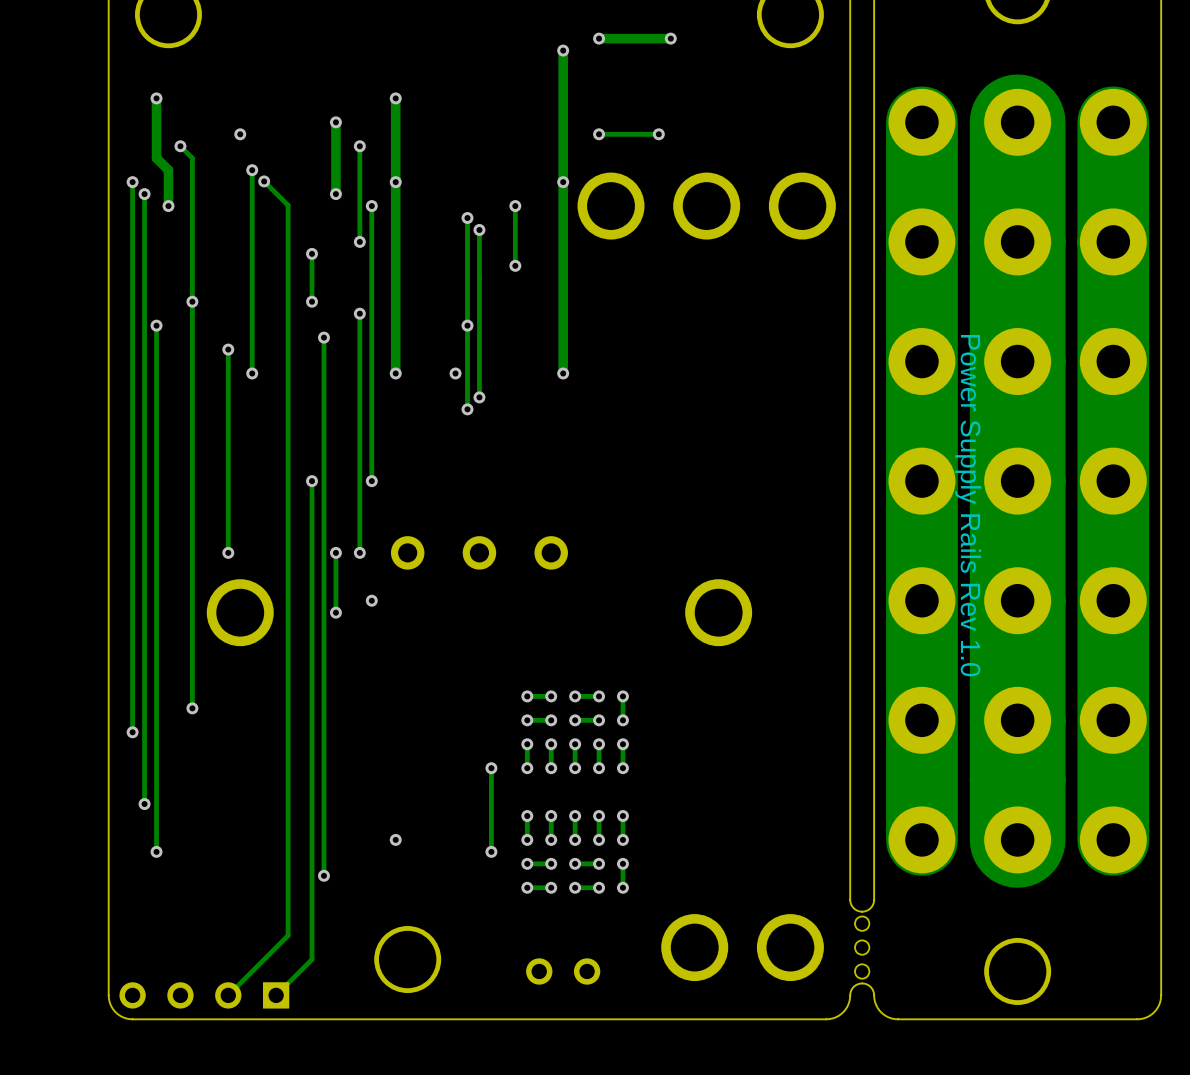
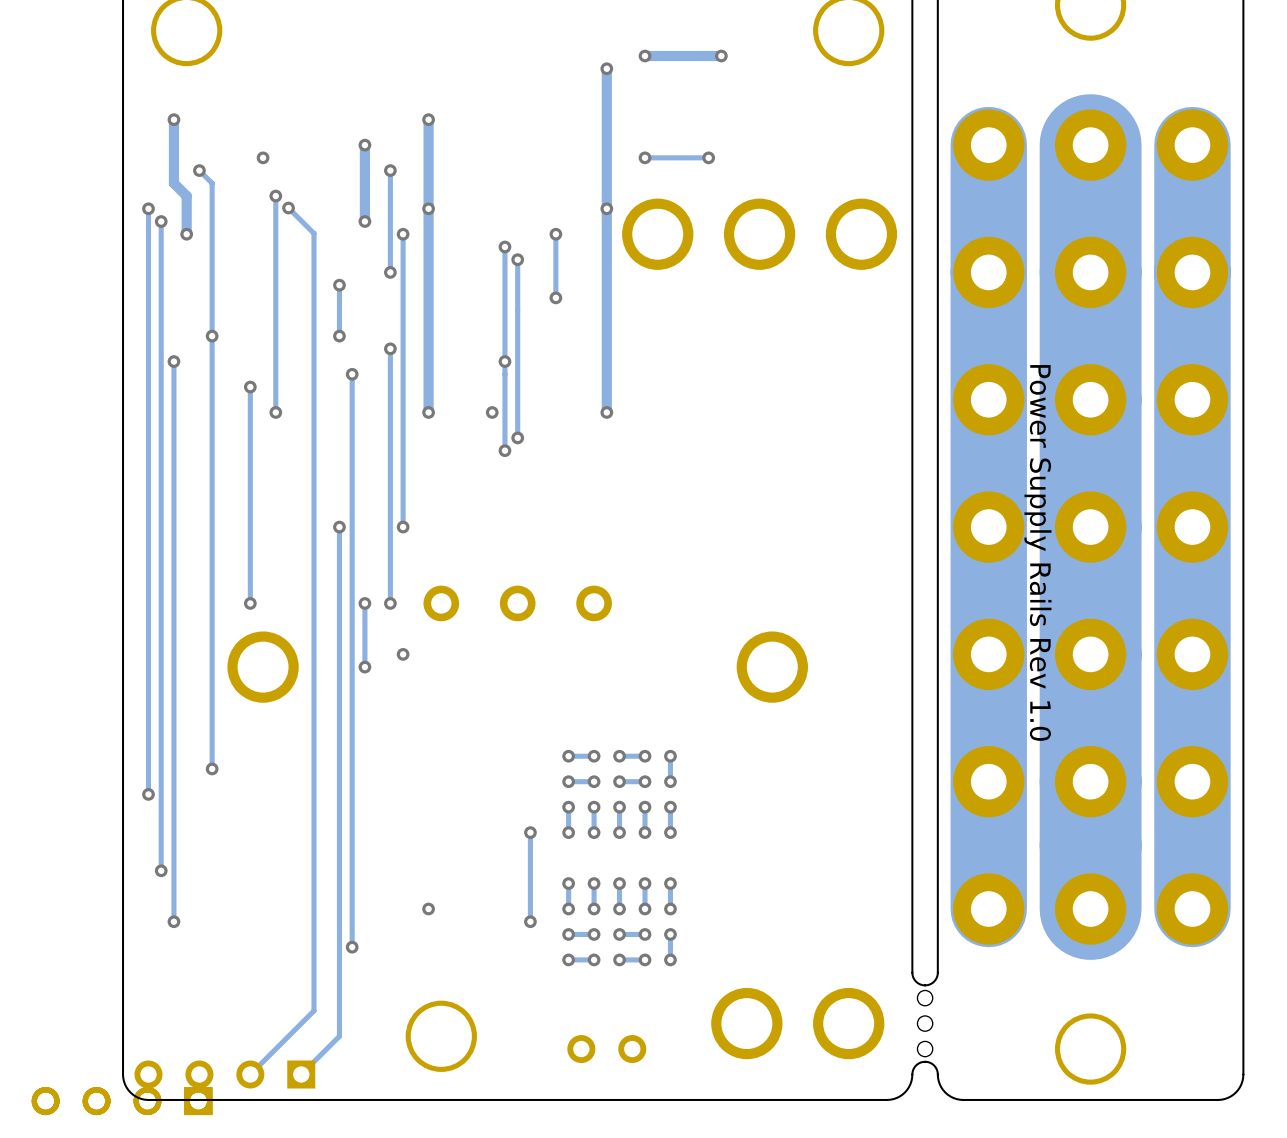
part: none -> (122, 1101)

